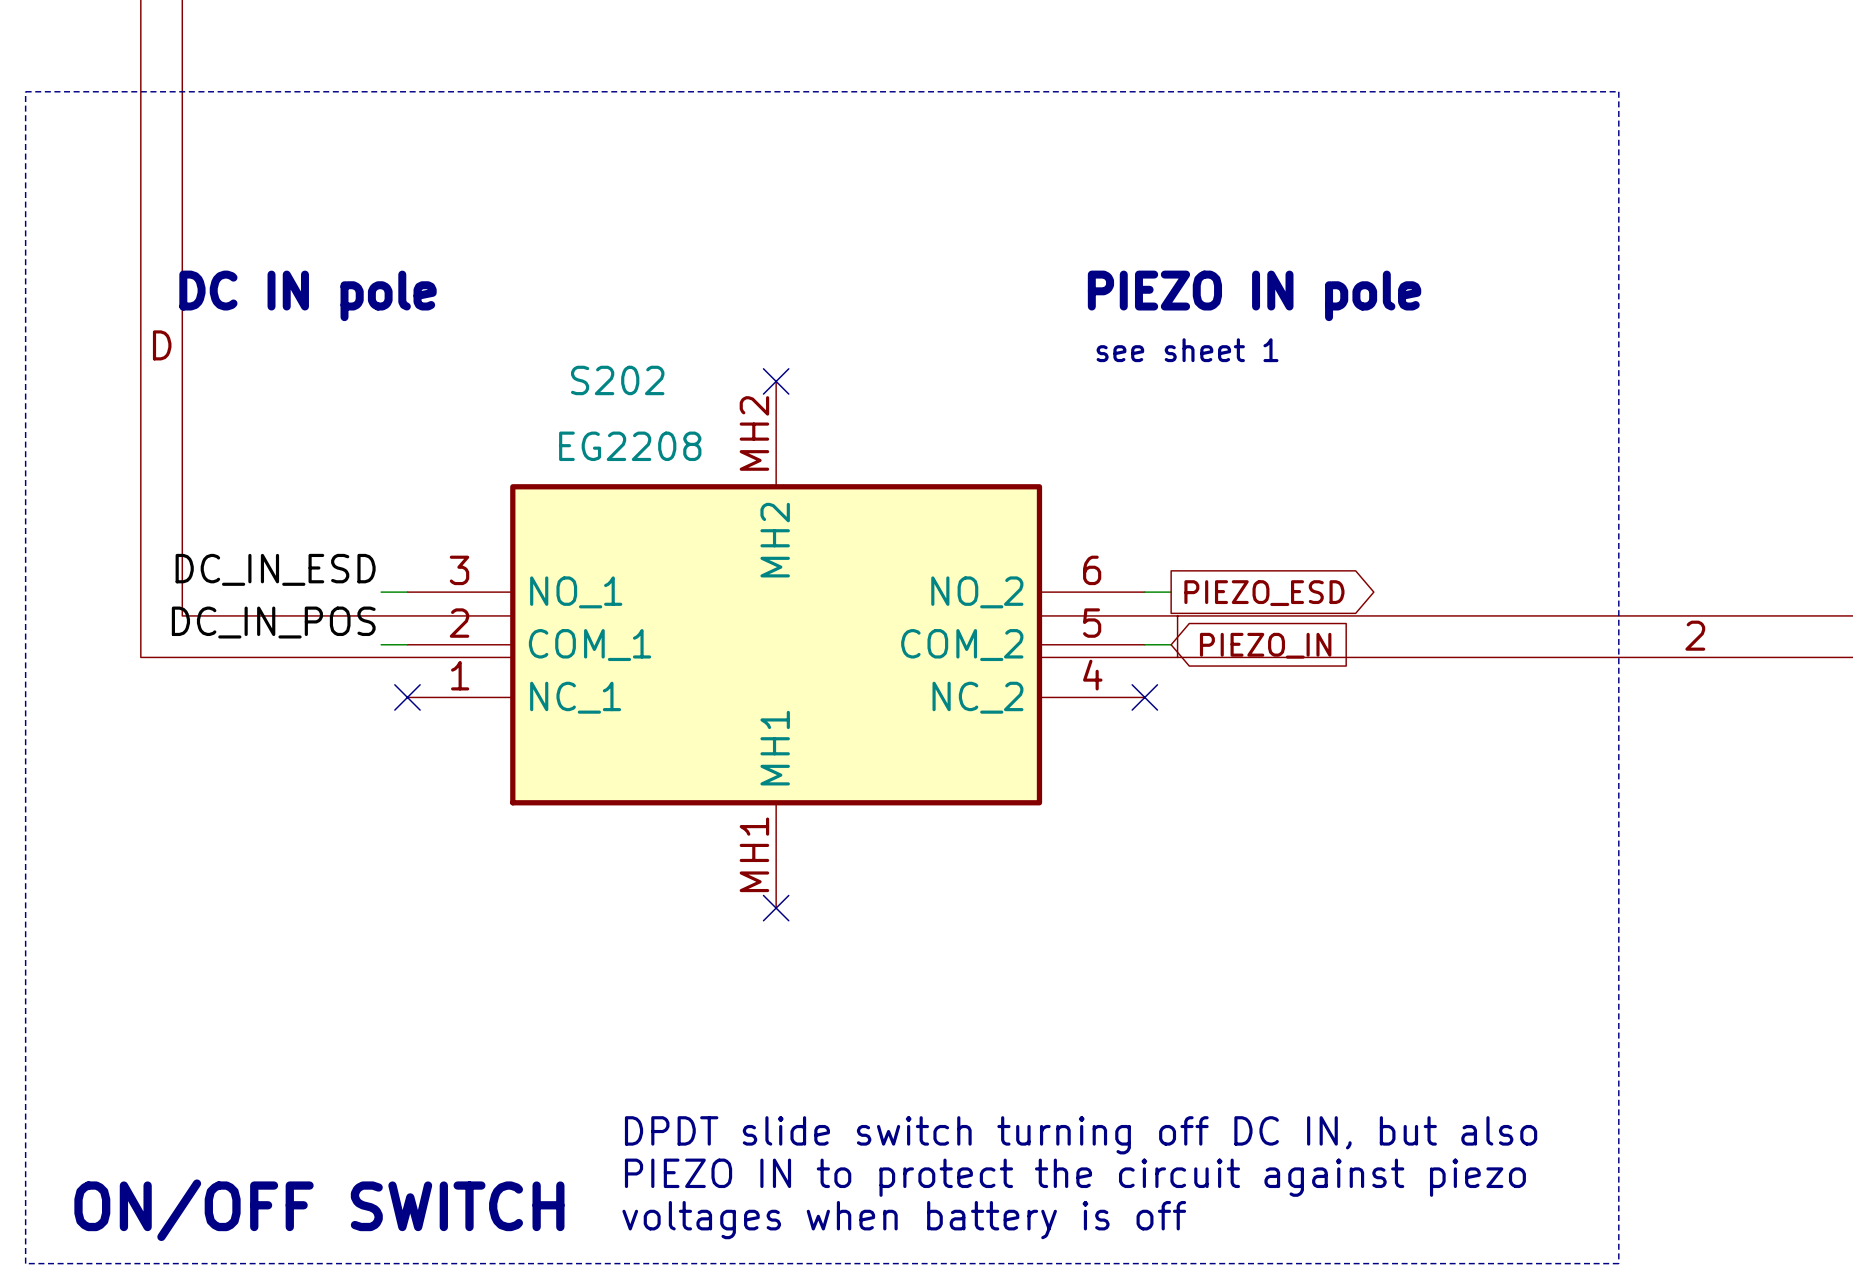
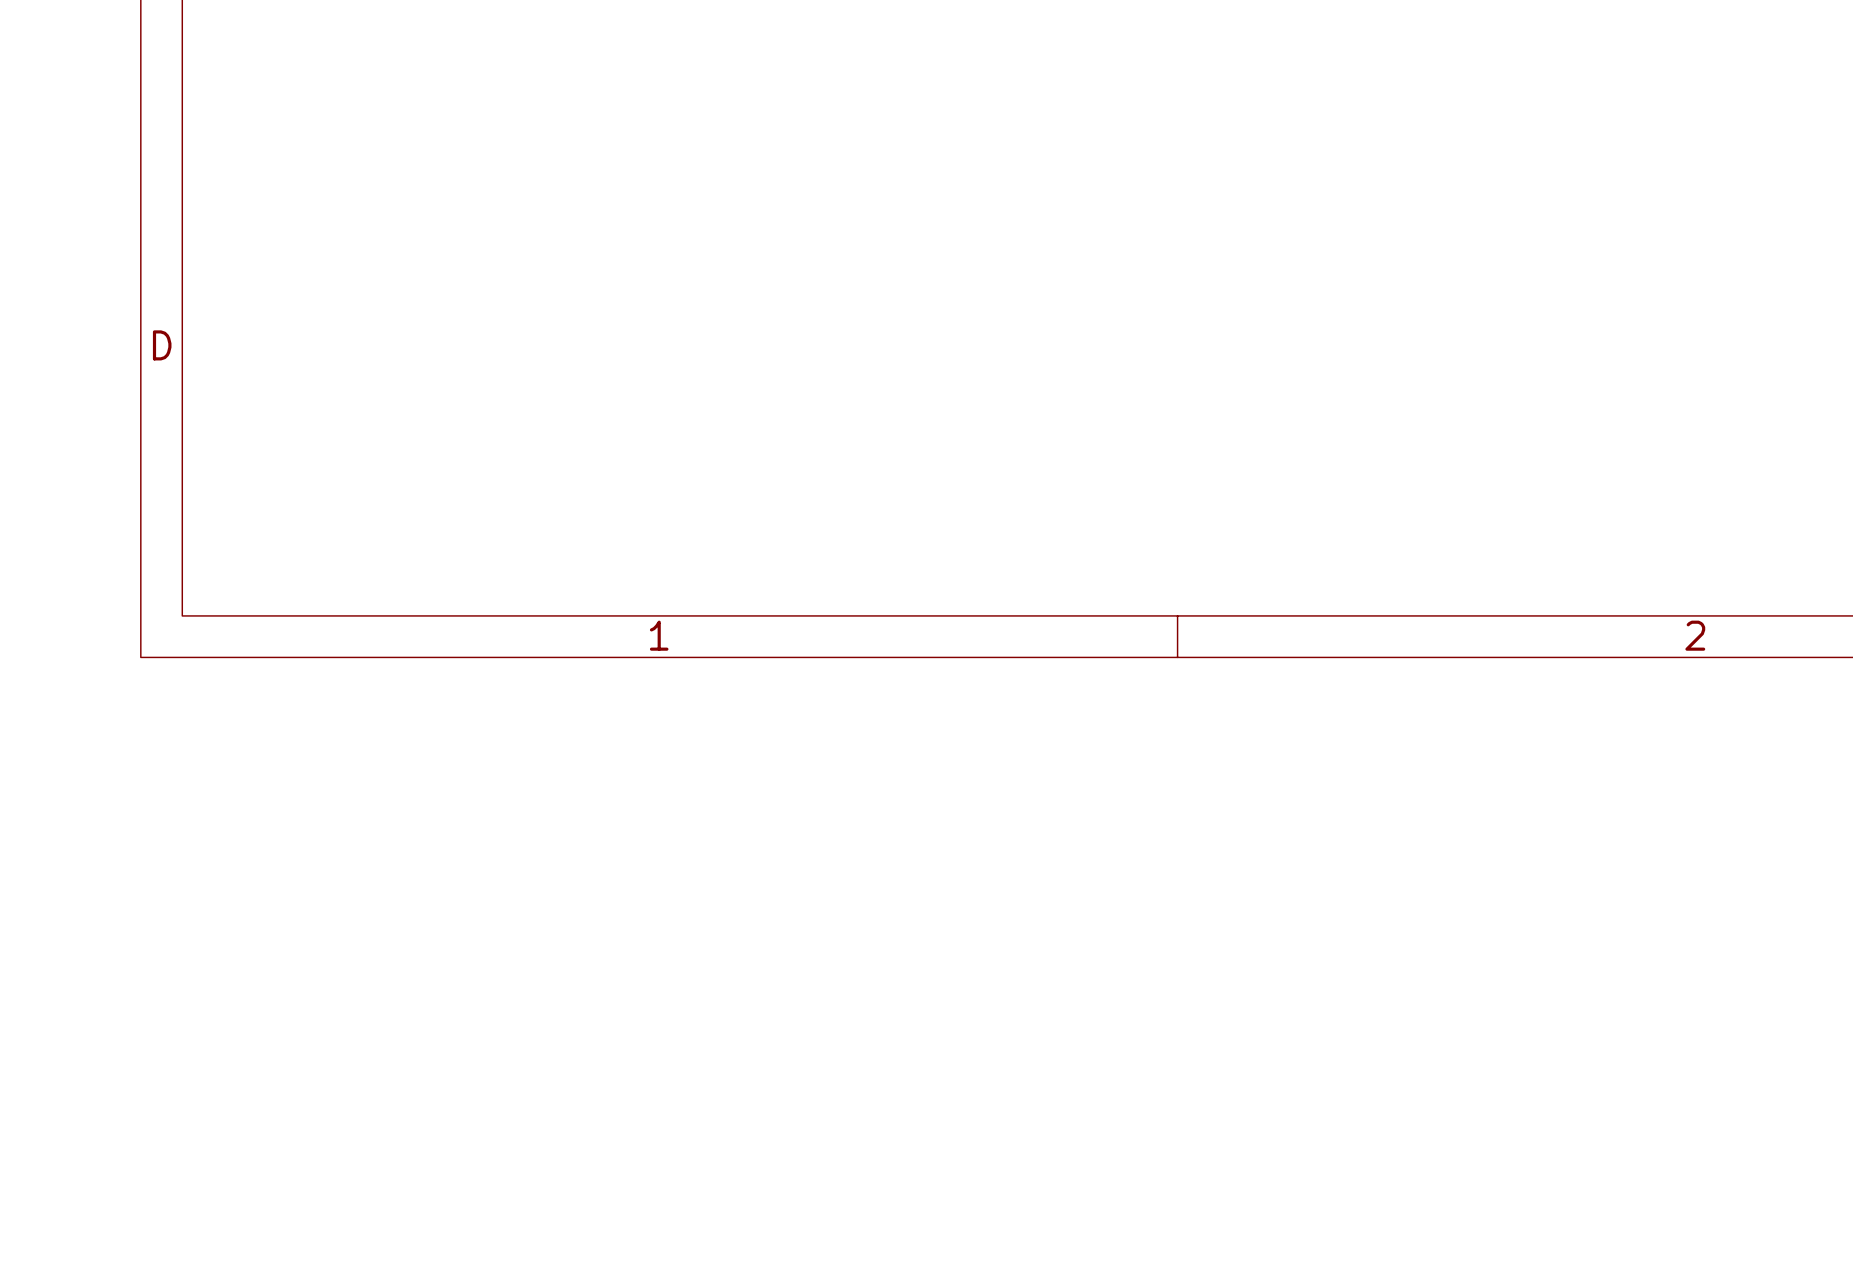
line: (25, 91) (1618, 91) (1618, 1263) (25, 1263) (25, 91) -> none
text: DC IN pole (308, 295) -> none
text: PIEZO IN pole (1254, 295) -> none
text: see sheet 1 (1187, 350) -> none
no-connect mark: (776, 381) -> none
label: DC_IN_ESD (275, 569) -> none
wire: (381, 592) (407, 592) -> none
wire: (1144, 592) (1171, 592) -> none
global label: PIEZO_ESD (1264, 593) -> none
label: DC_IN_POS (273, 622) -> none
wire: (381, 644) (407, 644) -> none
S202: EG2208 (776, 644) -> none
wire: (1144, 644) (1171, 644) -> none
global label: PIEZO_IN (1265, 645) -> none
no-connect mark: (407, 697) -> none
no-connect mark: (1144, 697) -> none
no-connect mark: (776, 908) -> none
text: DPDT slide switch turning off DC IN, but also (1081, 1135) -> none
text: PIEZO IN to protect the circuit against piezo (1075, 1177) -> none
text: ON/OFF SWITCH (319, 1210) -> none
text: voltages when battery is off (904, 1220) -> none

